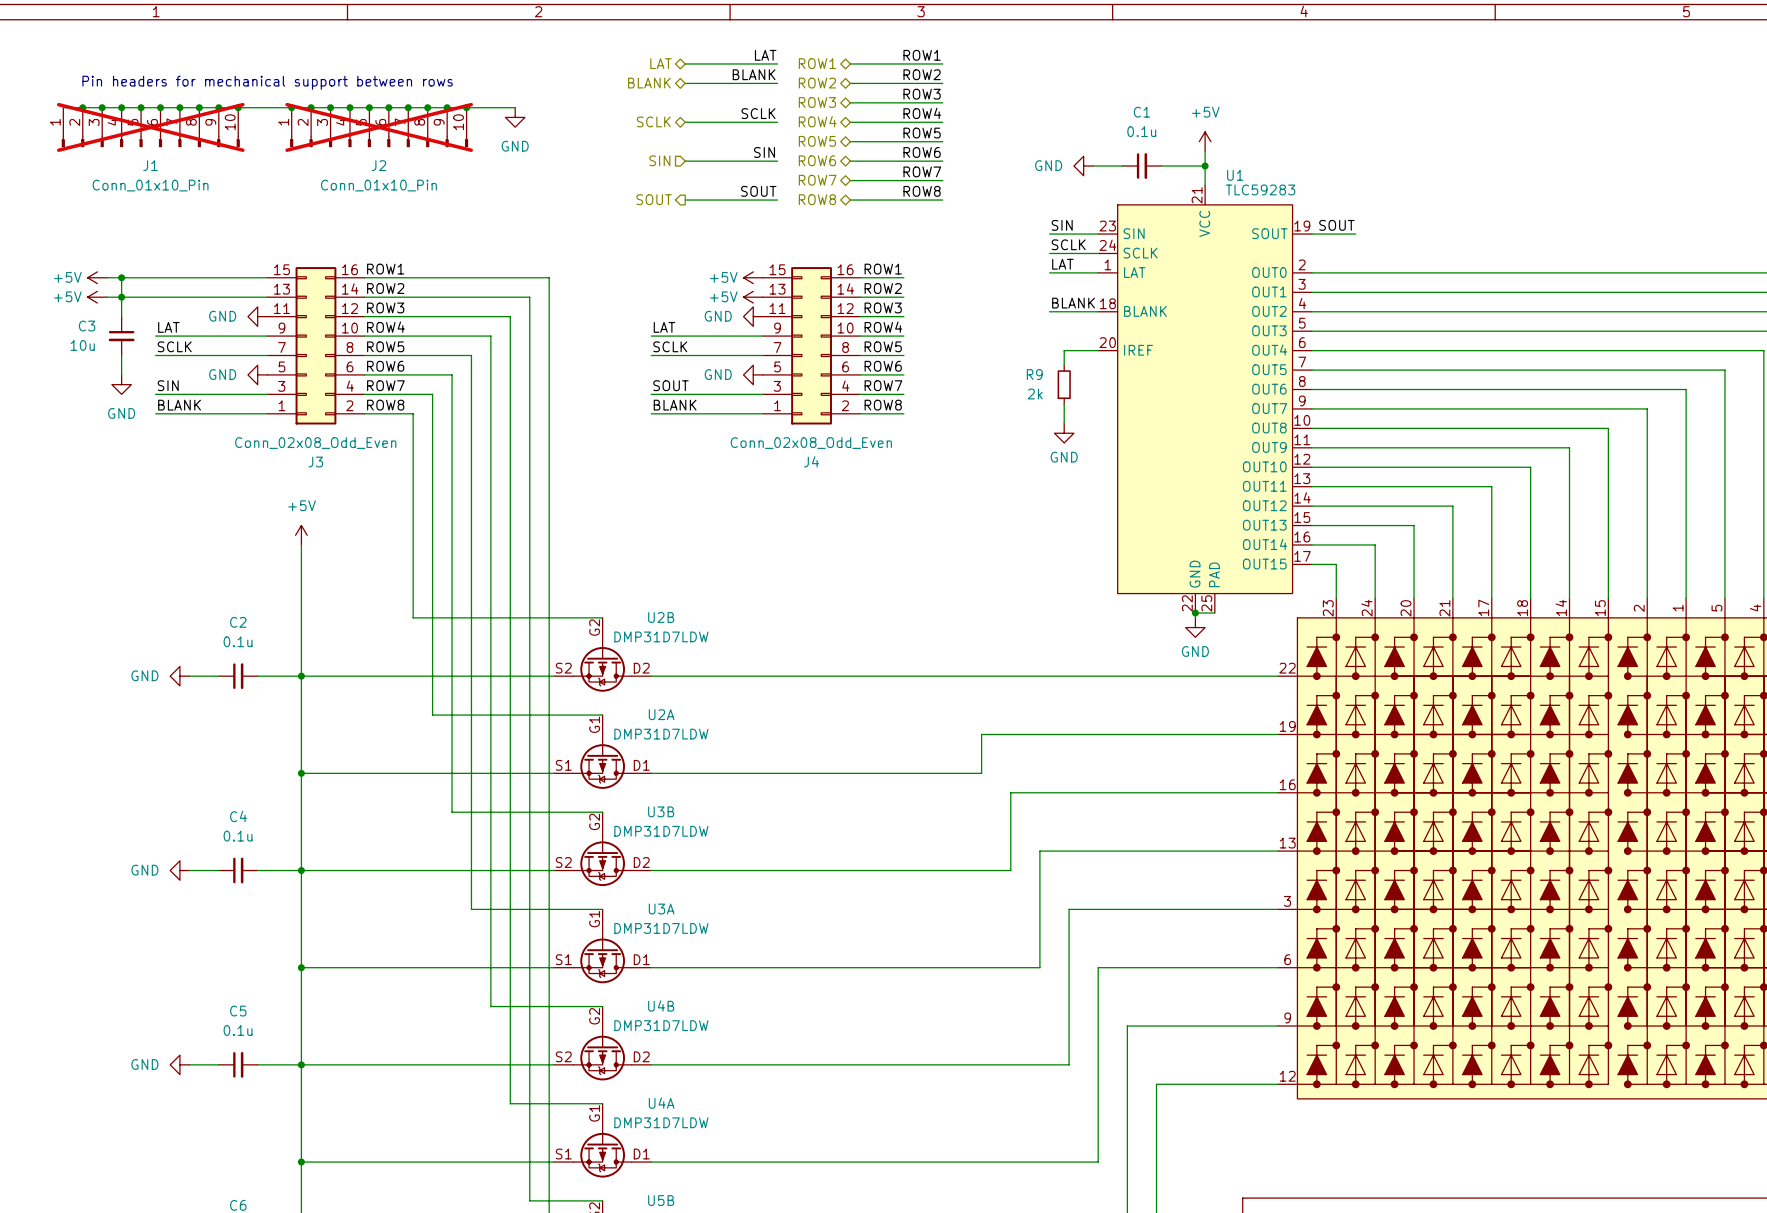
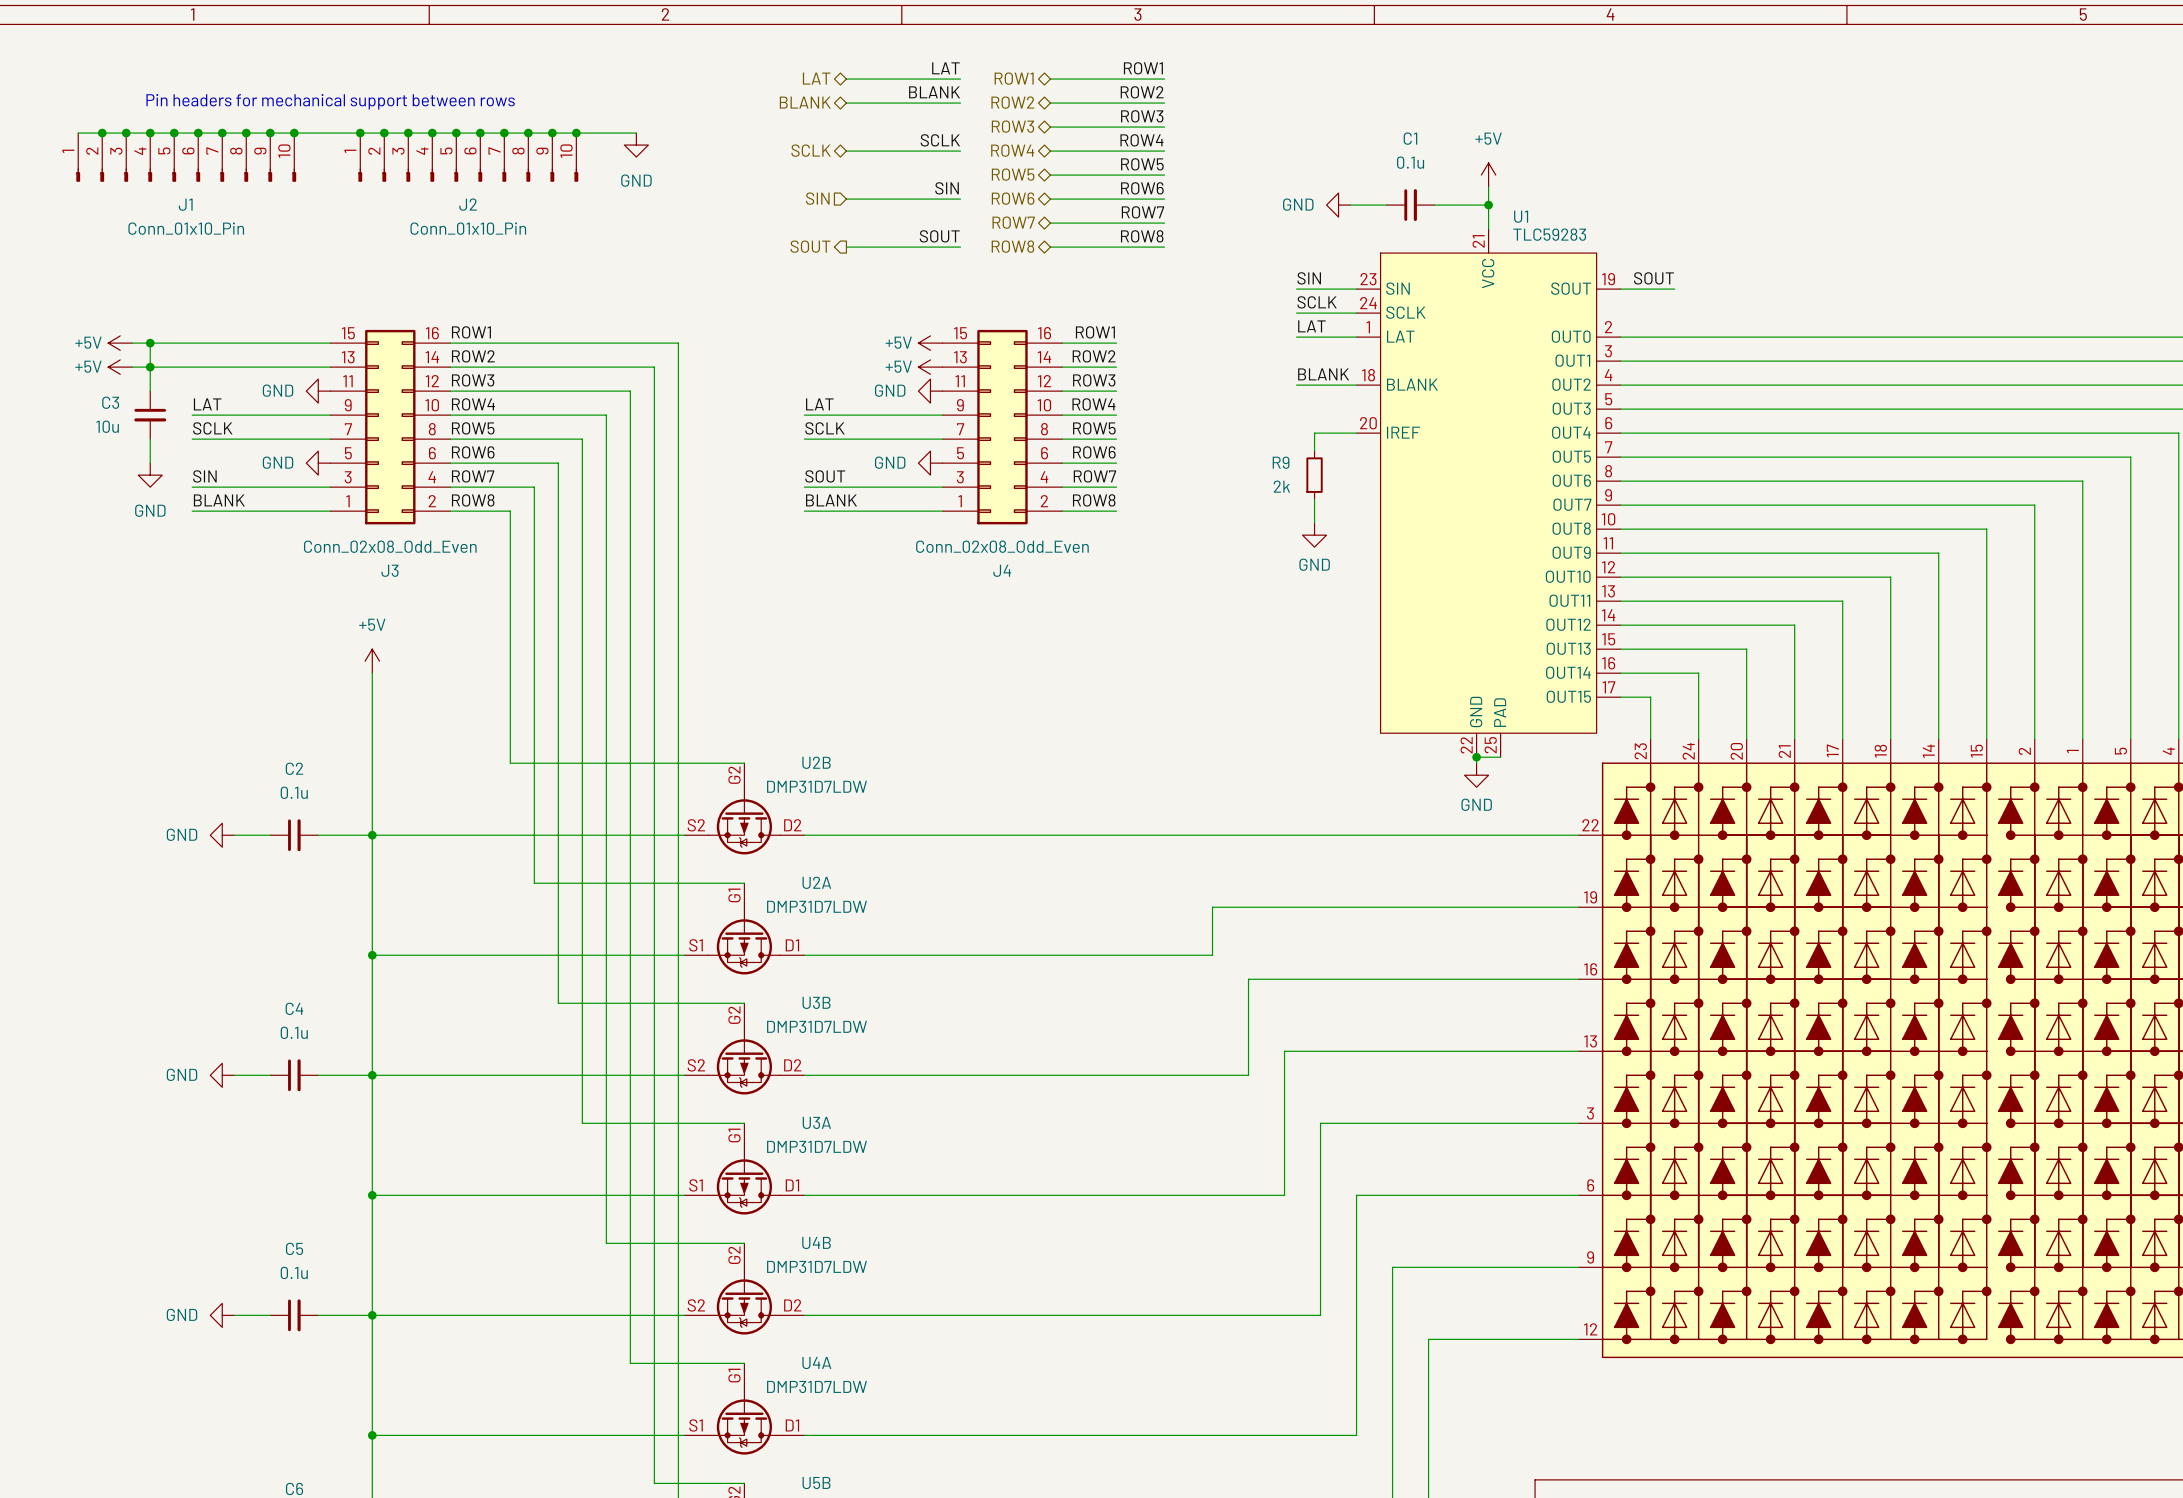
J1 do-not-place cross: (150, 127) -> none
J2 do-not-place cross: (379, 127) -> none

